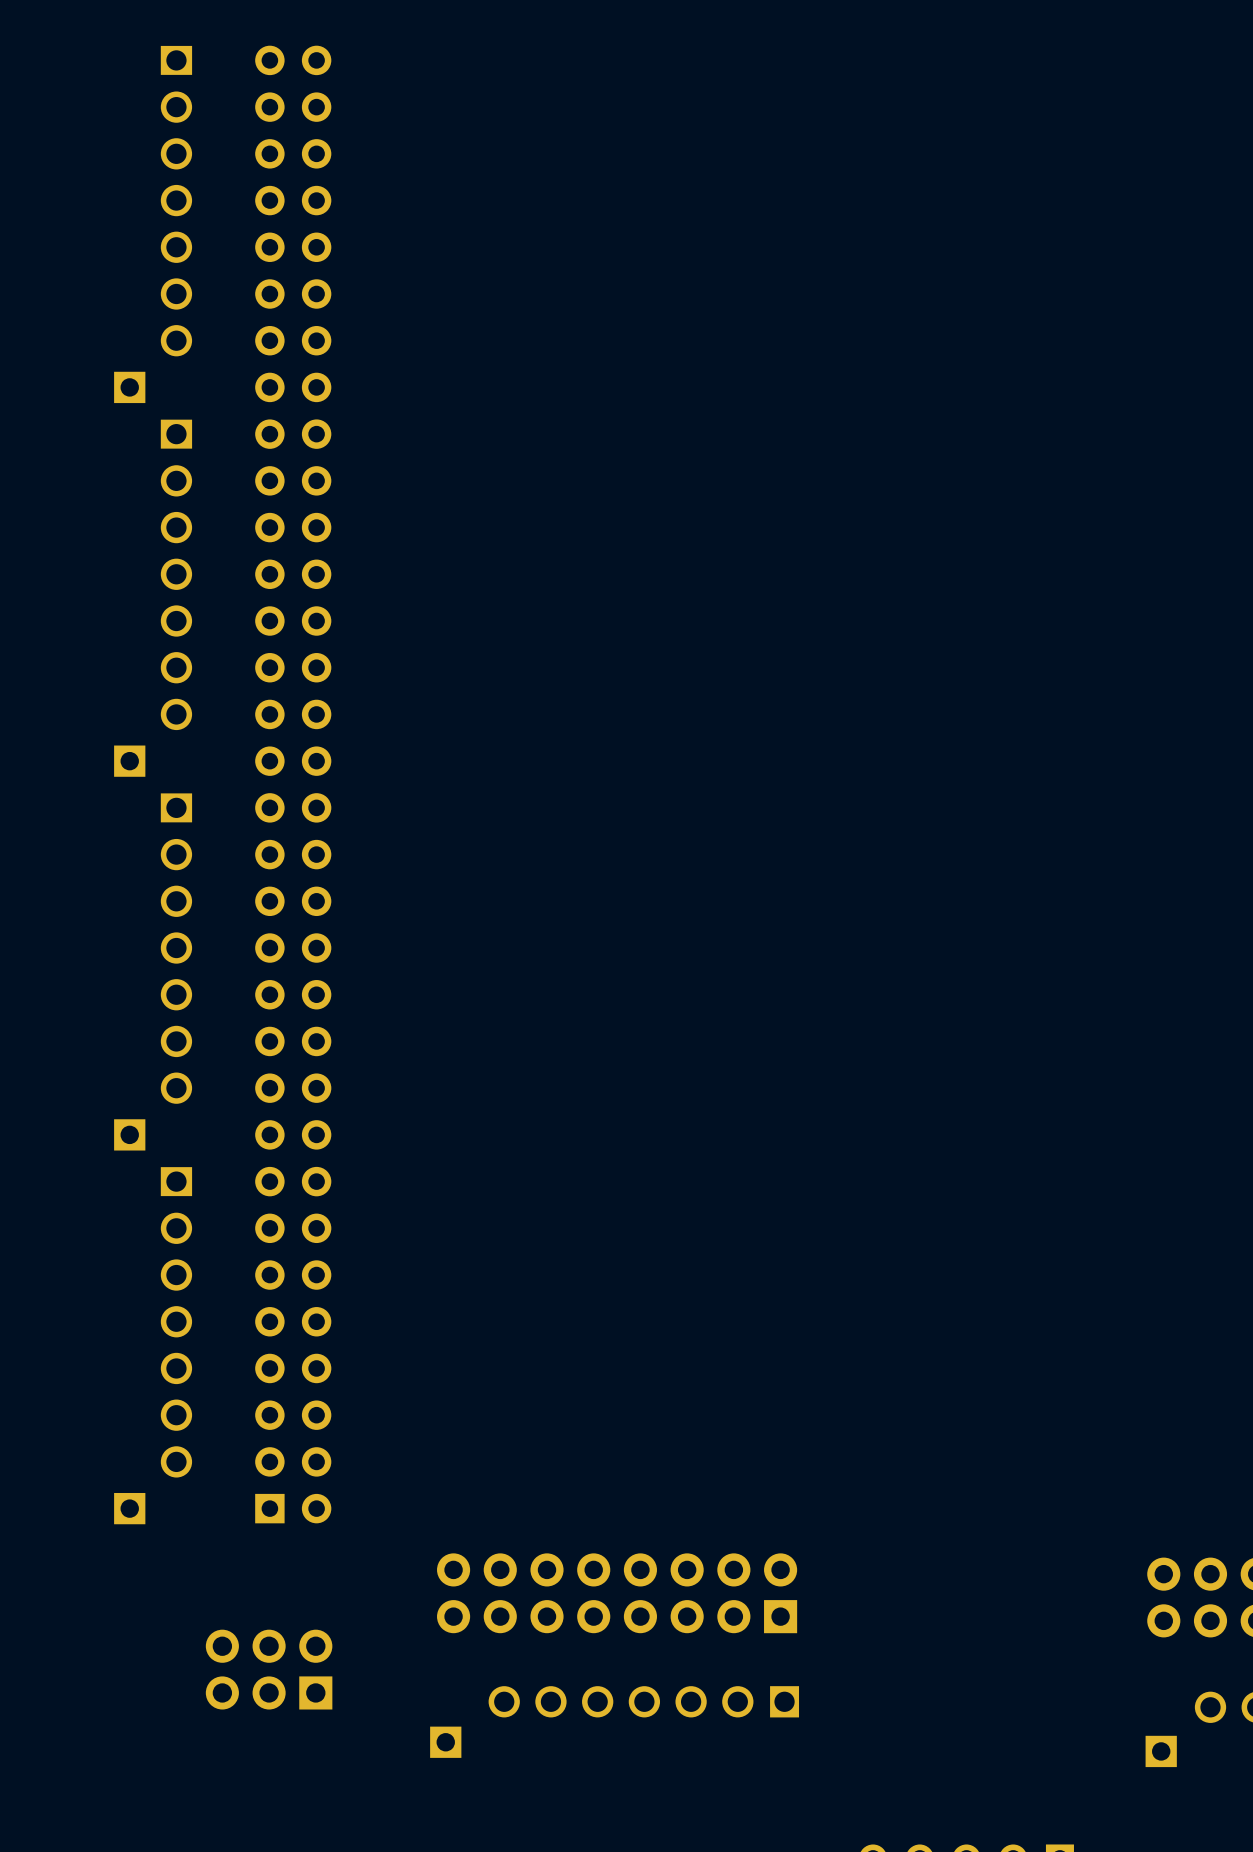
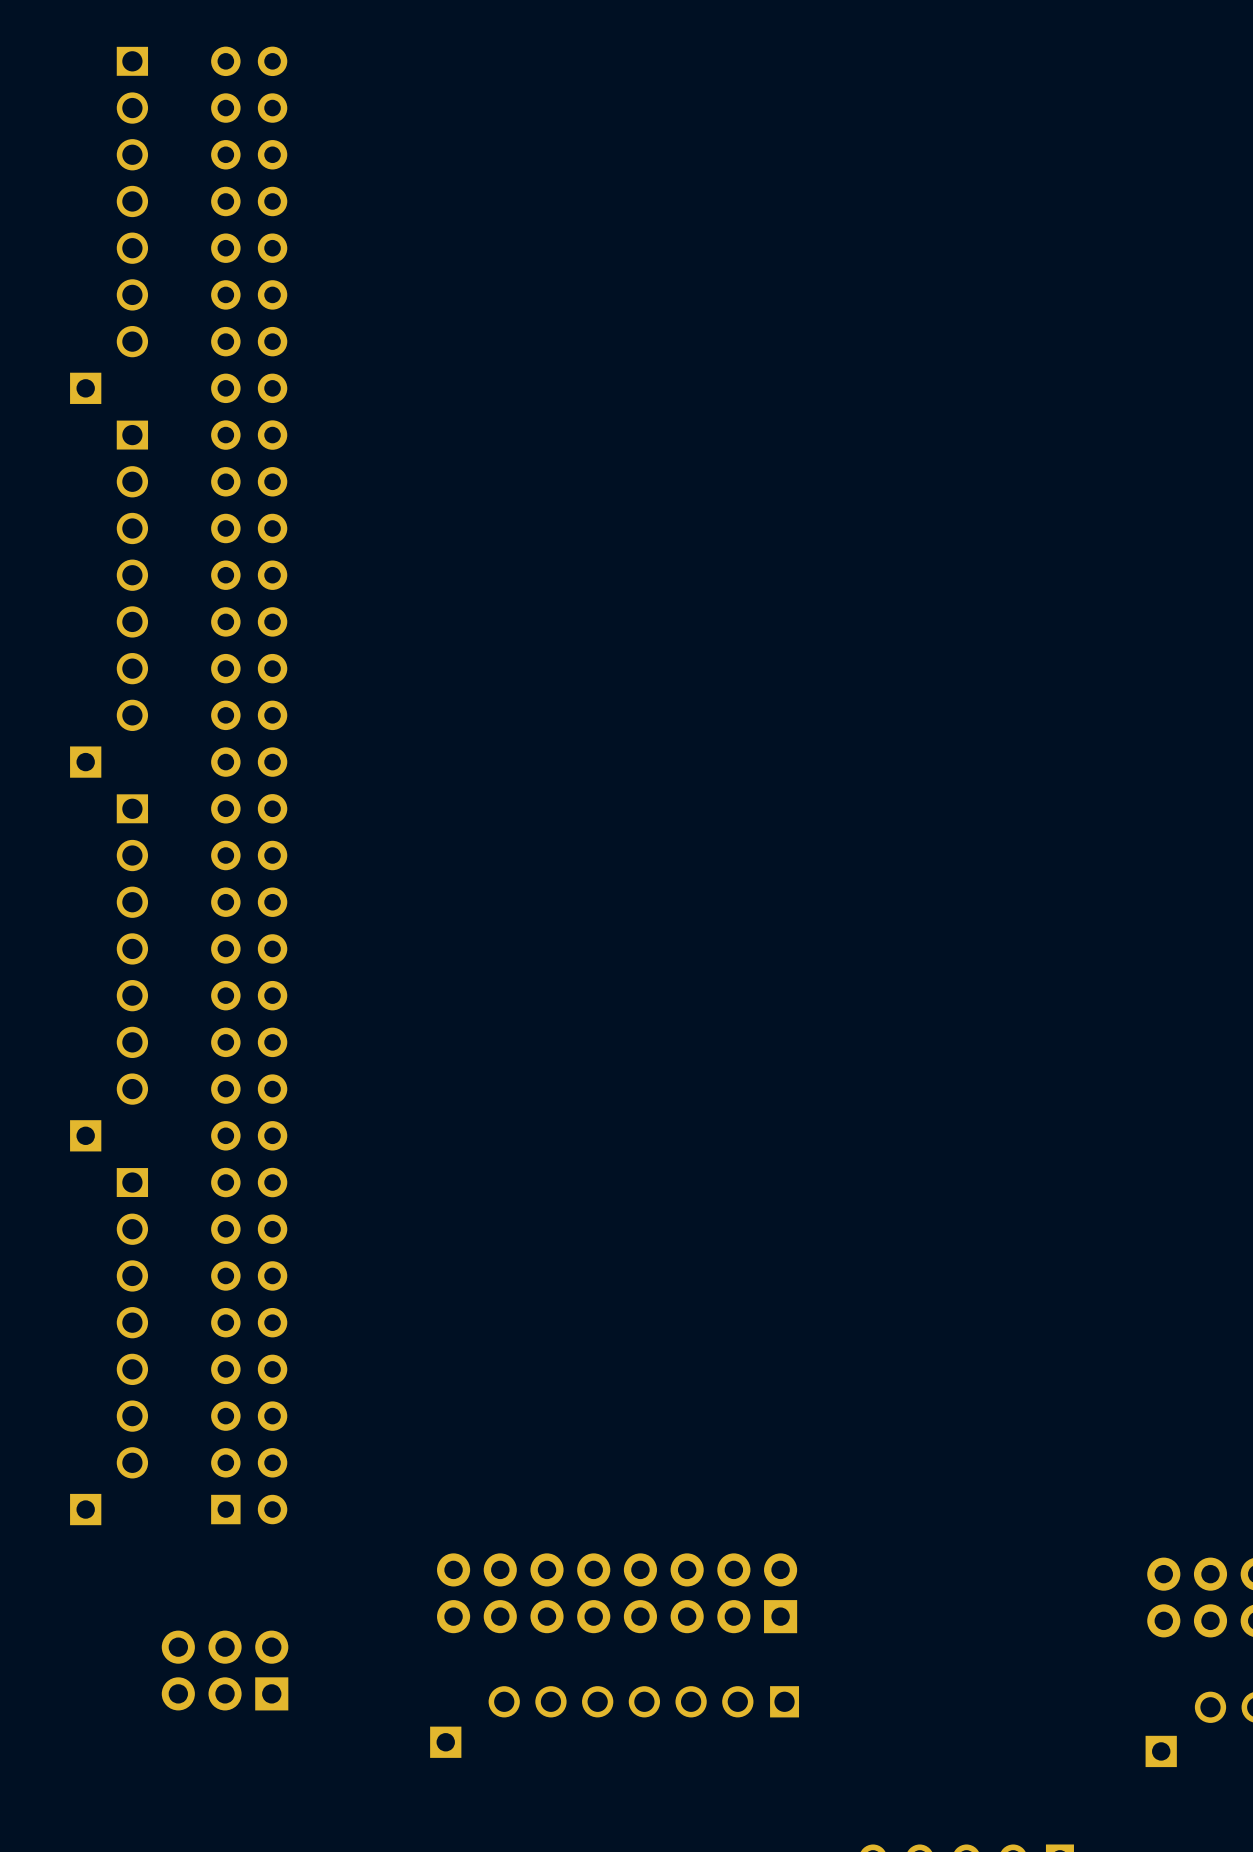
part position: (176, 201) -> (132, 202)
part position: (129, 387) -> (85, 388)
part position: (176, 574) -> (132, 575)
part position: (129, 761) -> (85, 762)
part position: (293, 784) -> (249, 785)
part position: (176, 948) -> (132, 949)
part position: (129, 1134) -> (85, 1135)
part position: (176, 1322) -> (132, 1323)
part position: (129, 1508) -> (85, 1509)
part position: (269, 1669) -> (225, 1670)

